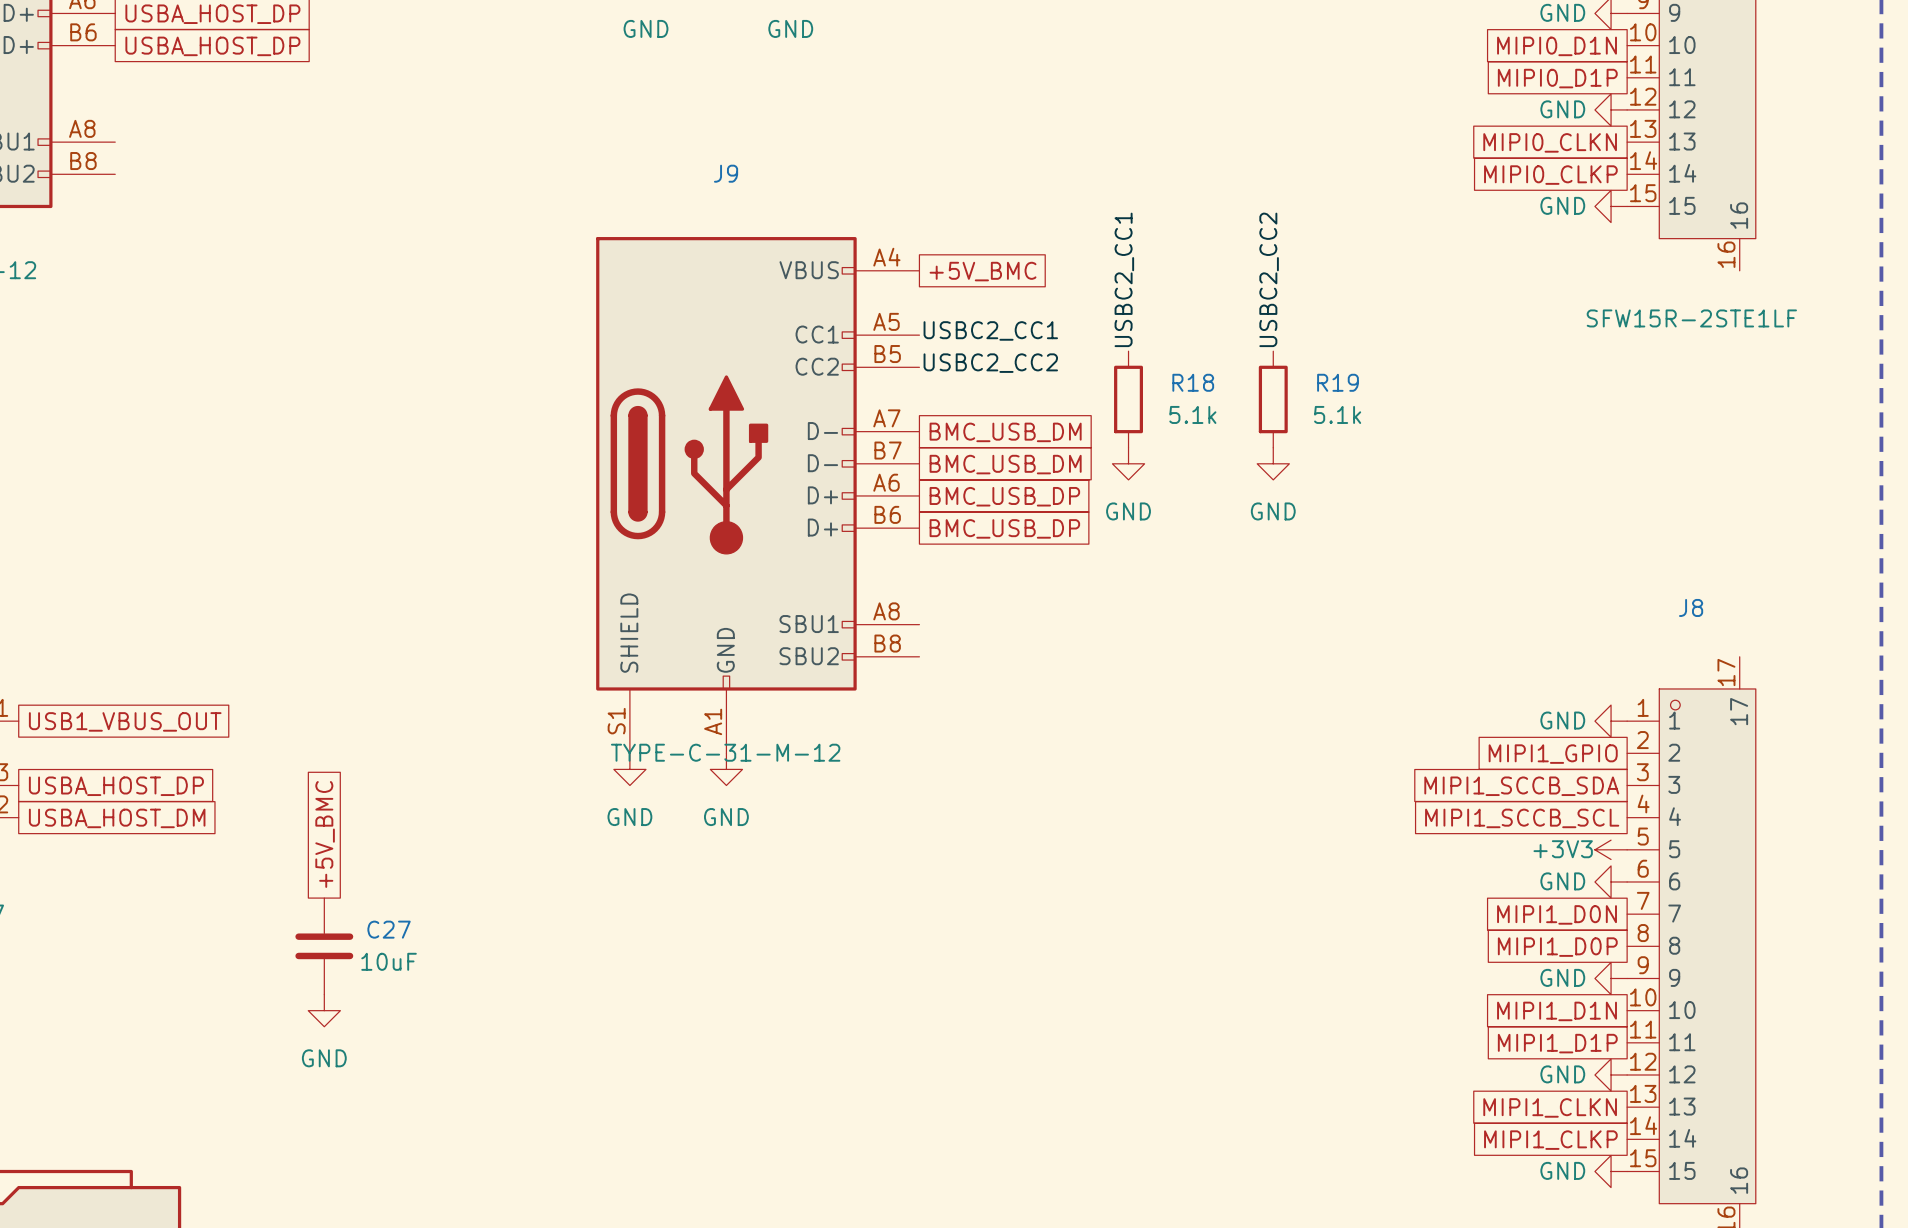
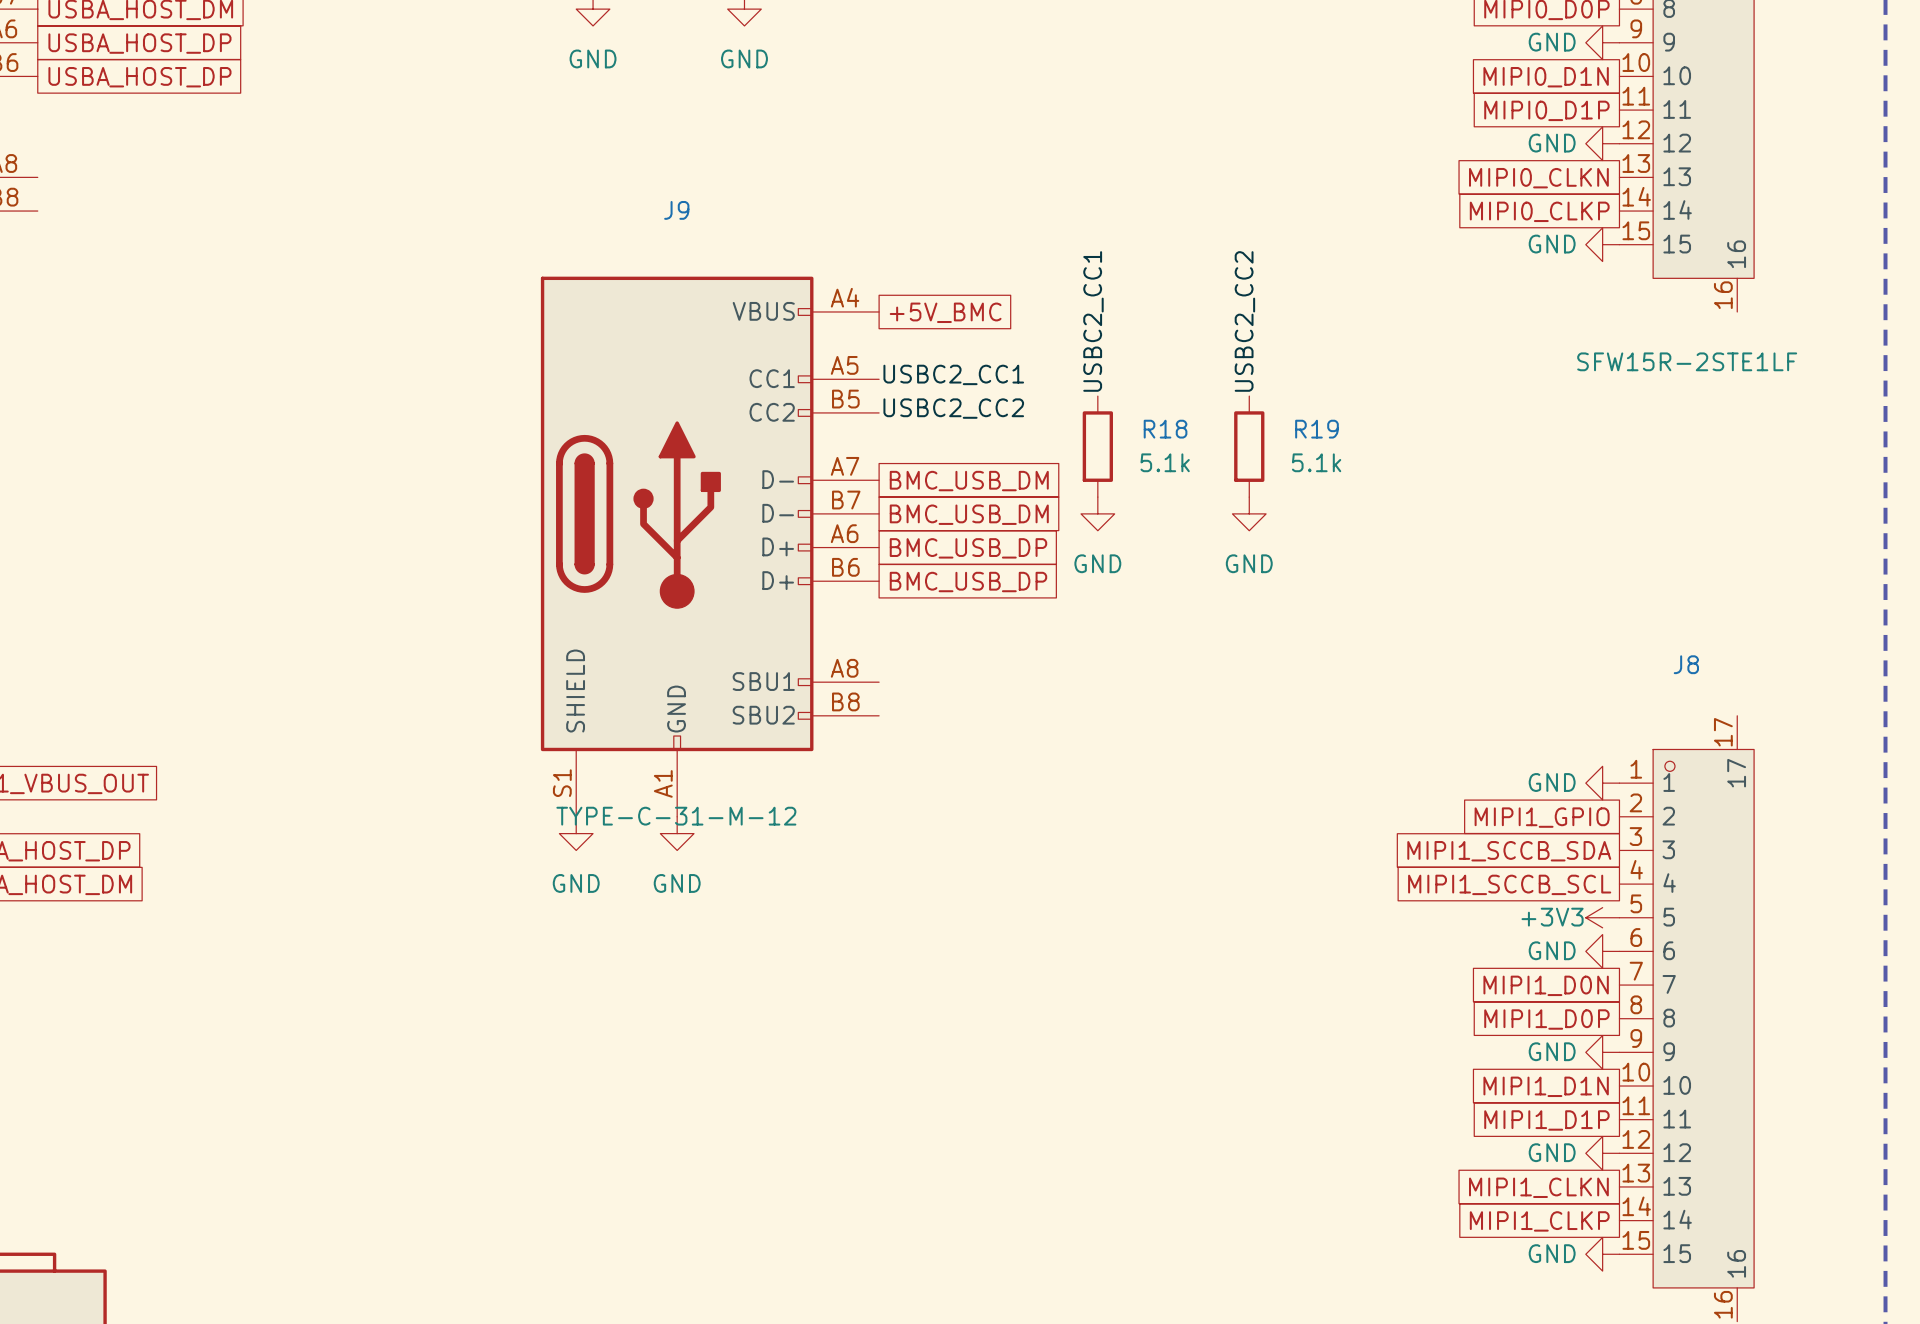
global label: +5V_BMC (325, 834) -> none
C27: 10uF (324, 946) -> none
power symbol: GND (324, 1010) -> none

